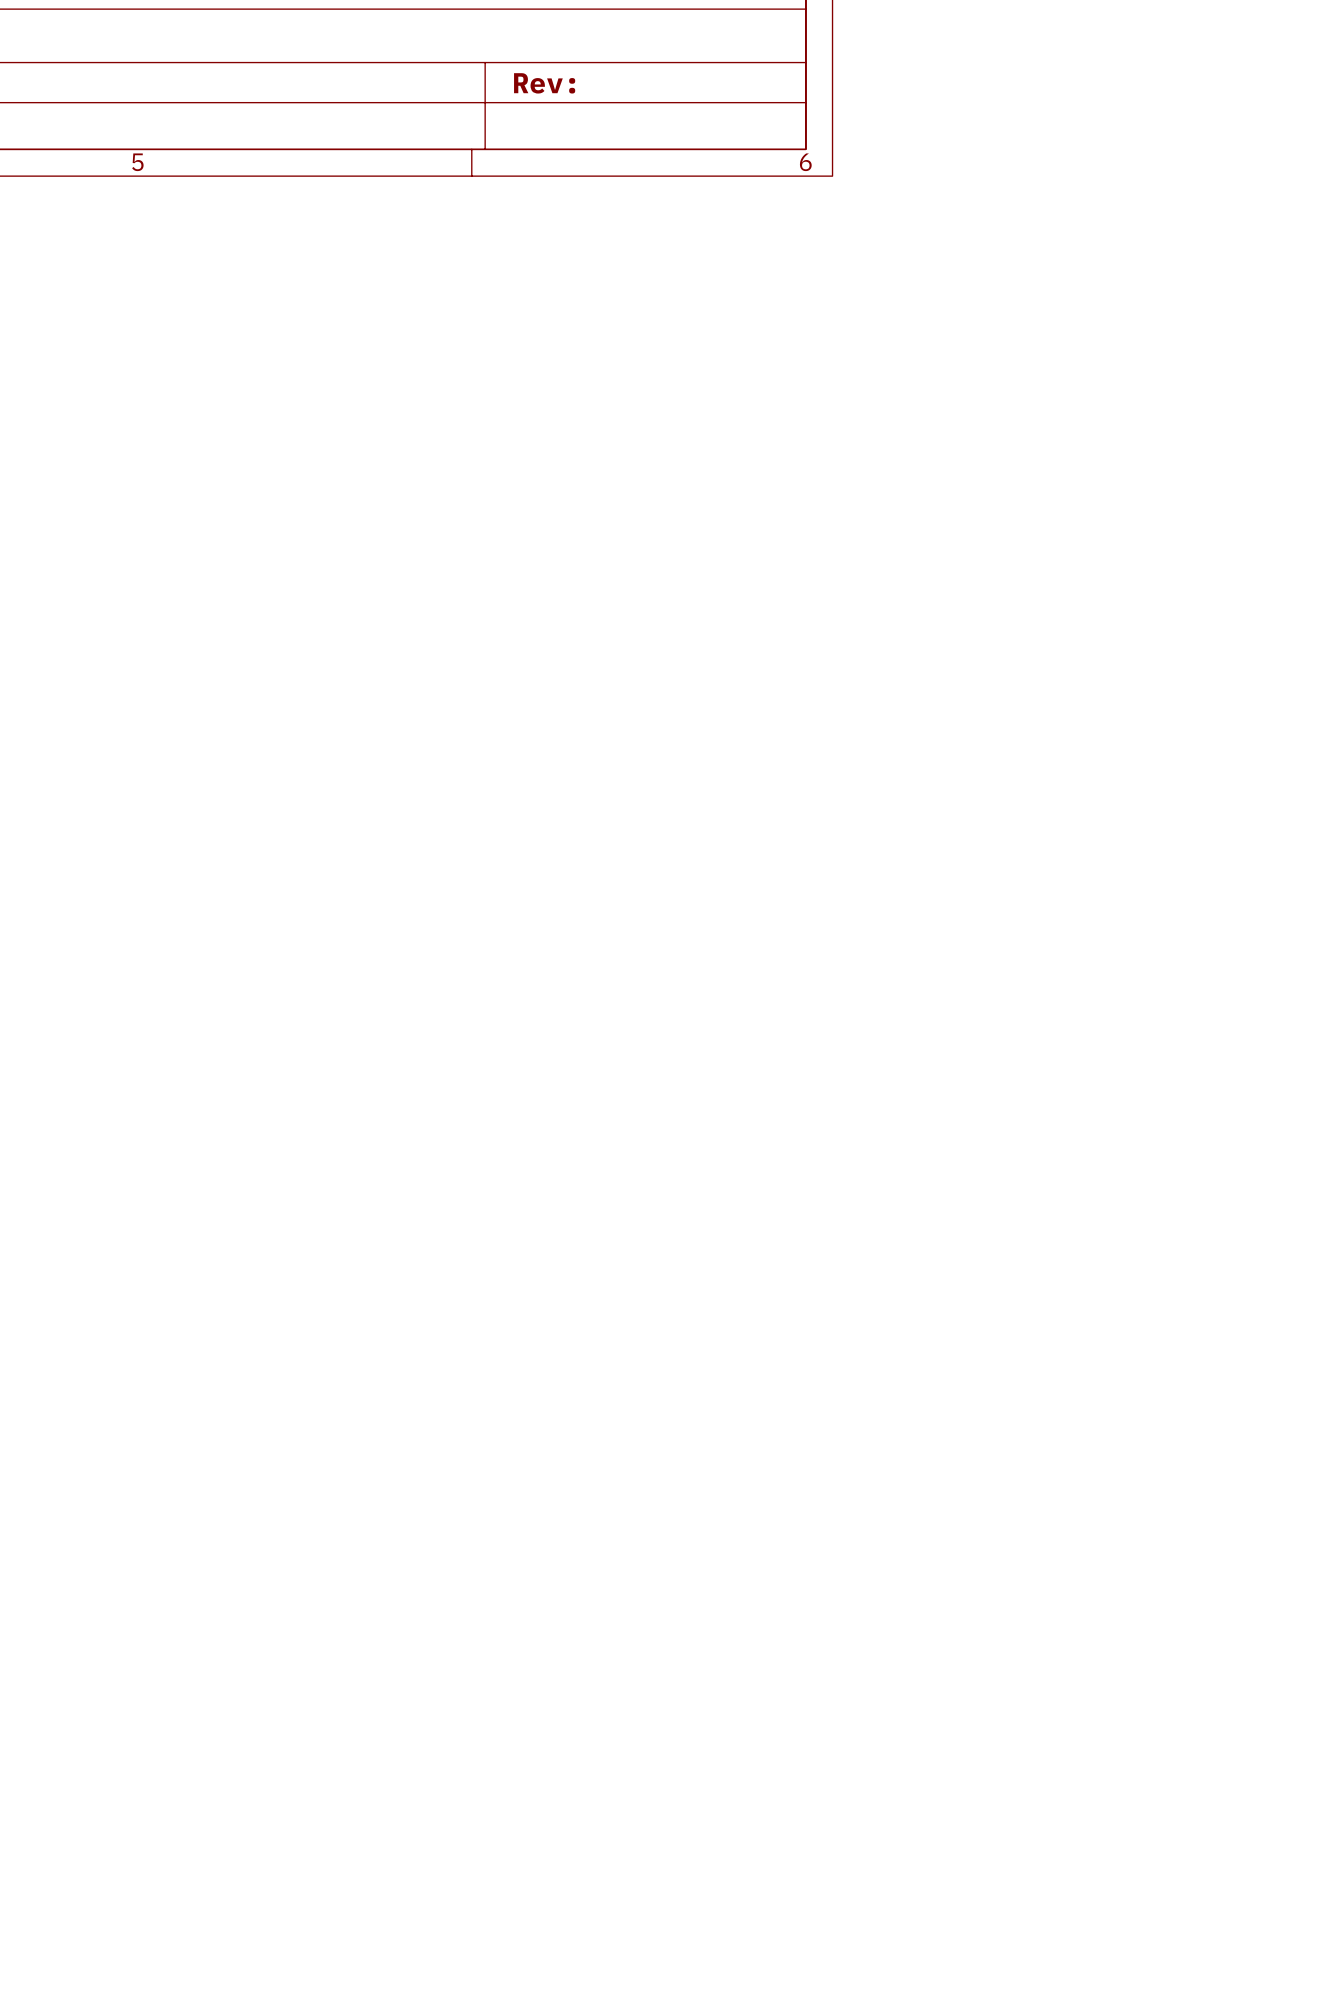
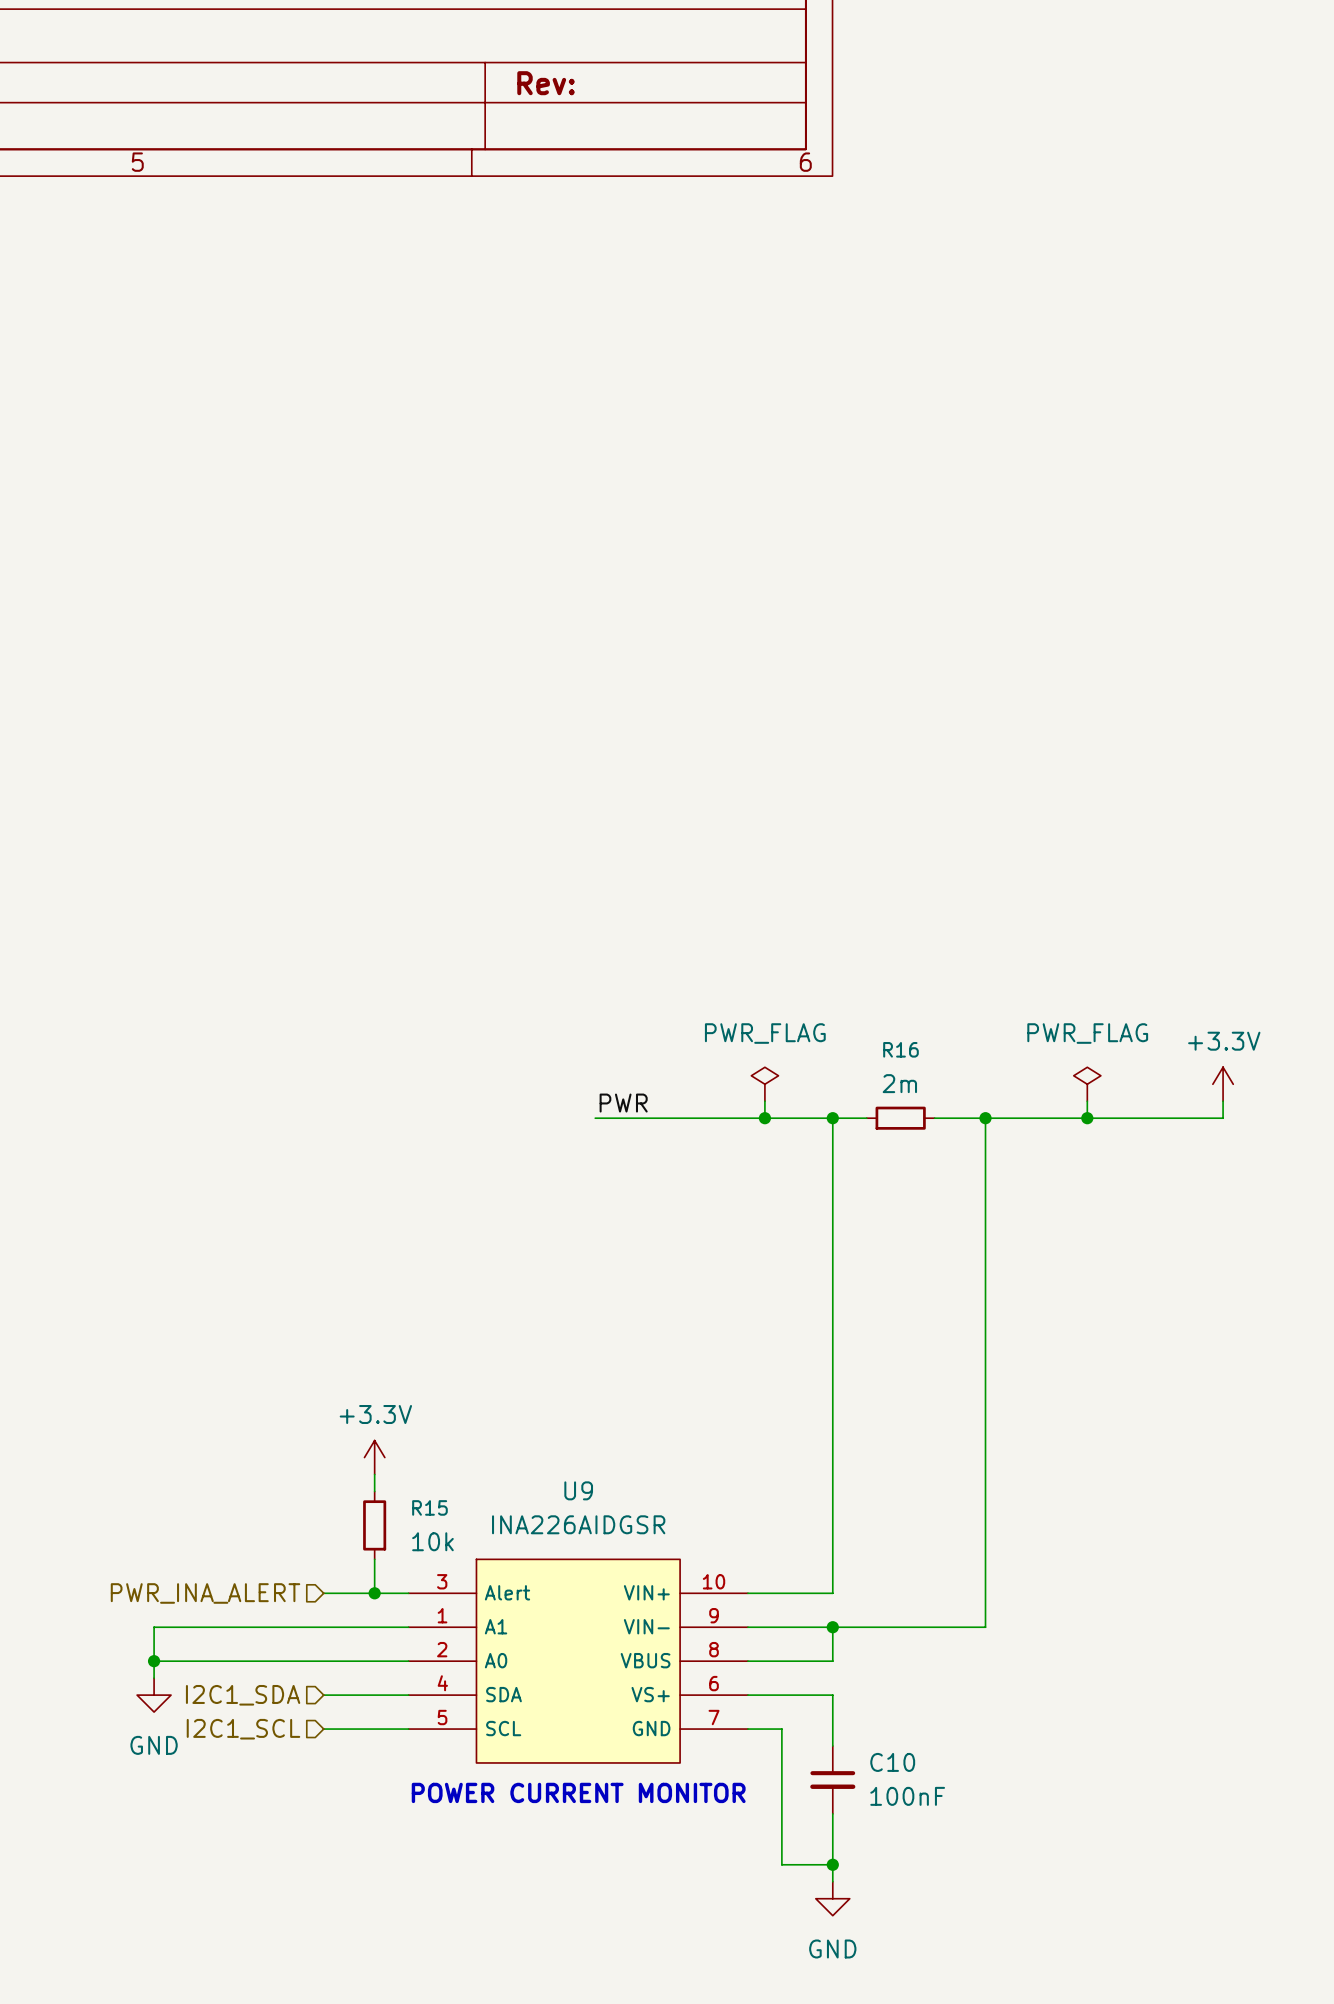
power symbol: none -> PWR_FLAG (764, 1084)
power symbol: none -> PWR_FLAG (1087, 1084)
power symbol: none -> +3.3V (1223, 1084)
wire: none -> (764, 1101) (764, 1118)
wire: none -> (1087, 1101) (1087, 1118)
wire: none -> (1223, 1101) (1223, 1118) (934, 1118)
label: none -> PWR (623, 1103)
wire: none -> (595, 1118) (866, 1118)
junction: none -> (764, 1118)
wire: none -> (832, 1118) (832, 1593) (747, 1593)
junction: none -> (832, 1118)
R16: none -> 2m (900, 1118)
wire: none -> (985, 1118) (985, 1627) (747, 1627)
junction: none -> (985, 1118)
junction: none -> (1087, 1118)
power symbol: none -> +3.3V (374, 1457)
wire: none -> (374, 1474) (374, 1491)
R15: none -> 10k (374, 1525)
wire: none -> (374, 1559) (374, 1593)
wire: none -> (323, 1593) (408, 1593)
junction: none -> (374, 1593)
hierarchical label: none -> PWR_INA_ALERT (205, 1593)
wire: none -> (408, 1627) (154, 1627) (154, 1678)
wire: none -> (832, 1627) (832, 1661) (747, 1661)
junction: none -> (832, 1627)
wire: none -> (154, 1661) (408, 1661)
junction: none -> (154, 1661)
U9: none -> INA226AIDGSR (578, 1661)
power symbol: none -> GND (154, 1695)
wire: none -> (323, 1695) (408, 1695)
wire: none -> (747, 1695) (832, 1695) (832, 1746)
hierarchical label: none -> I2C1_SDA (243, 1695)
wire: none -> (323, 1729) (408, 1729)
wire: none -> (747, 1729) (781, 1729) (781, 1864) (832, 1864)
hierarchical label: none -> I2C1_SCL (243, 1729)
C10: none -> 100nF (832, 1779)
text: none -> POWER CURRENT MONITOR (578, 1792)
wire: none -> (832, 1813) (832, 1881)
junction: none -> (832, 1864)
power symbol: none -> GND (832, 1898)

